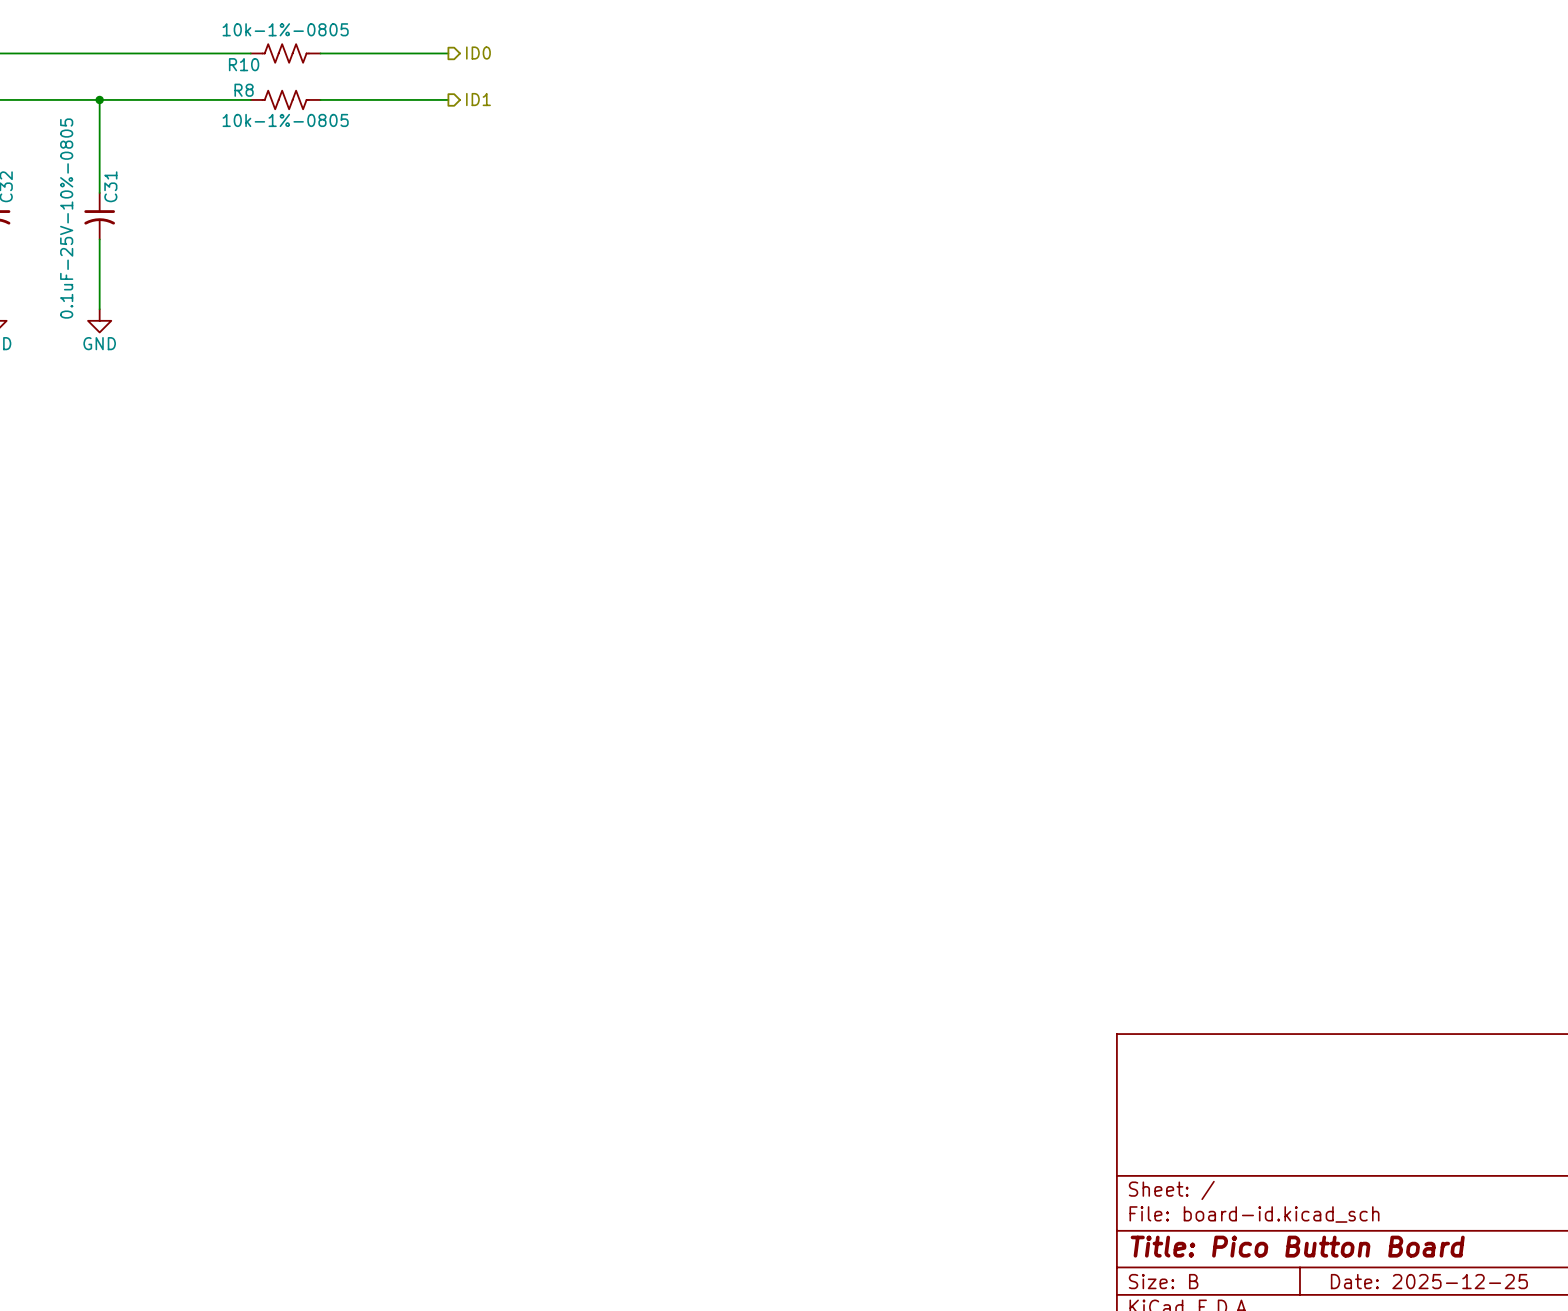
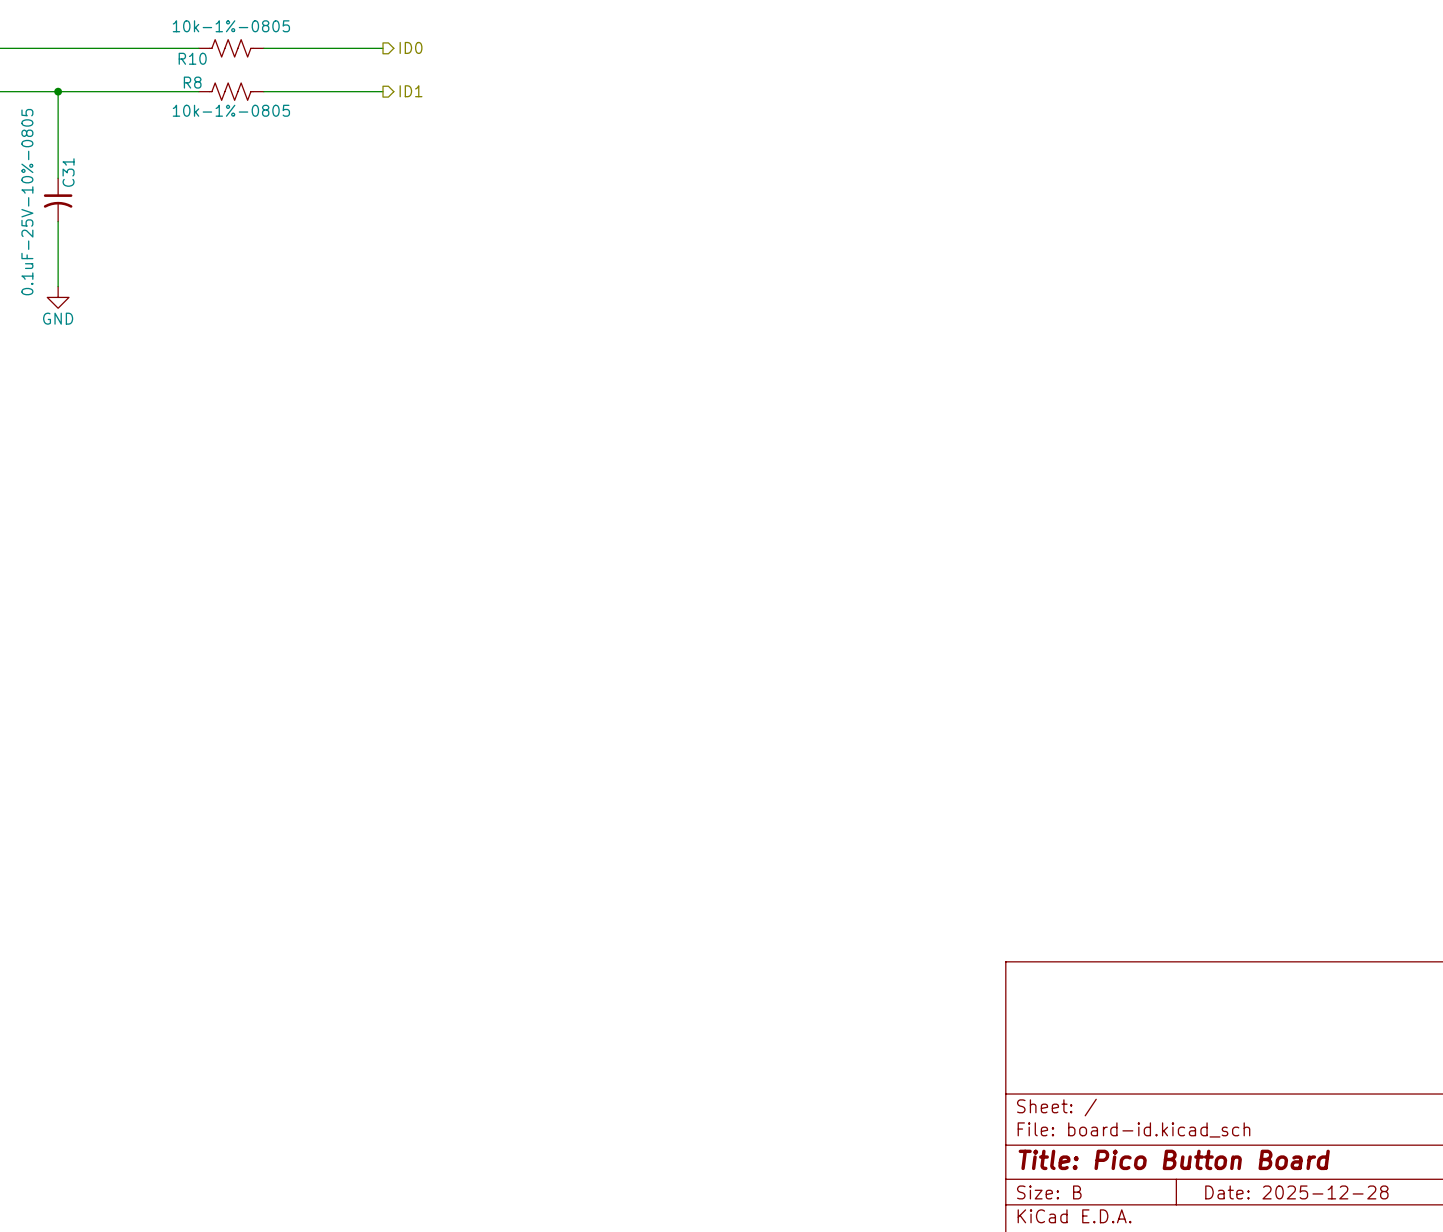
title block: Date: 2025-12-25 (1429, 1281) -> Date: 2025-12-28 (1296, 1192)

